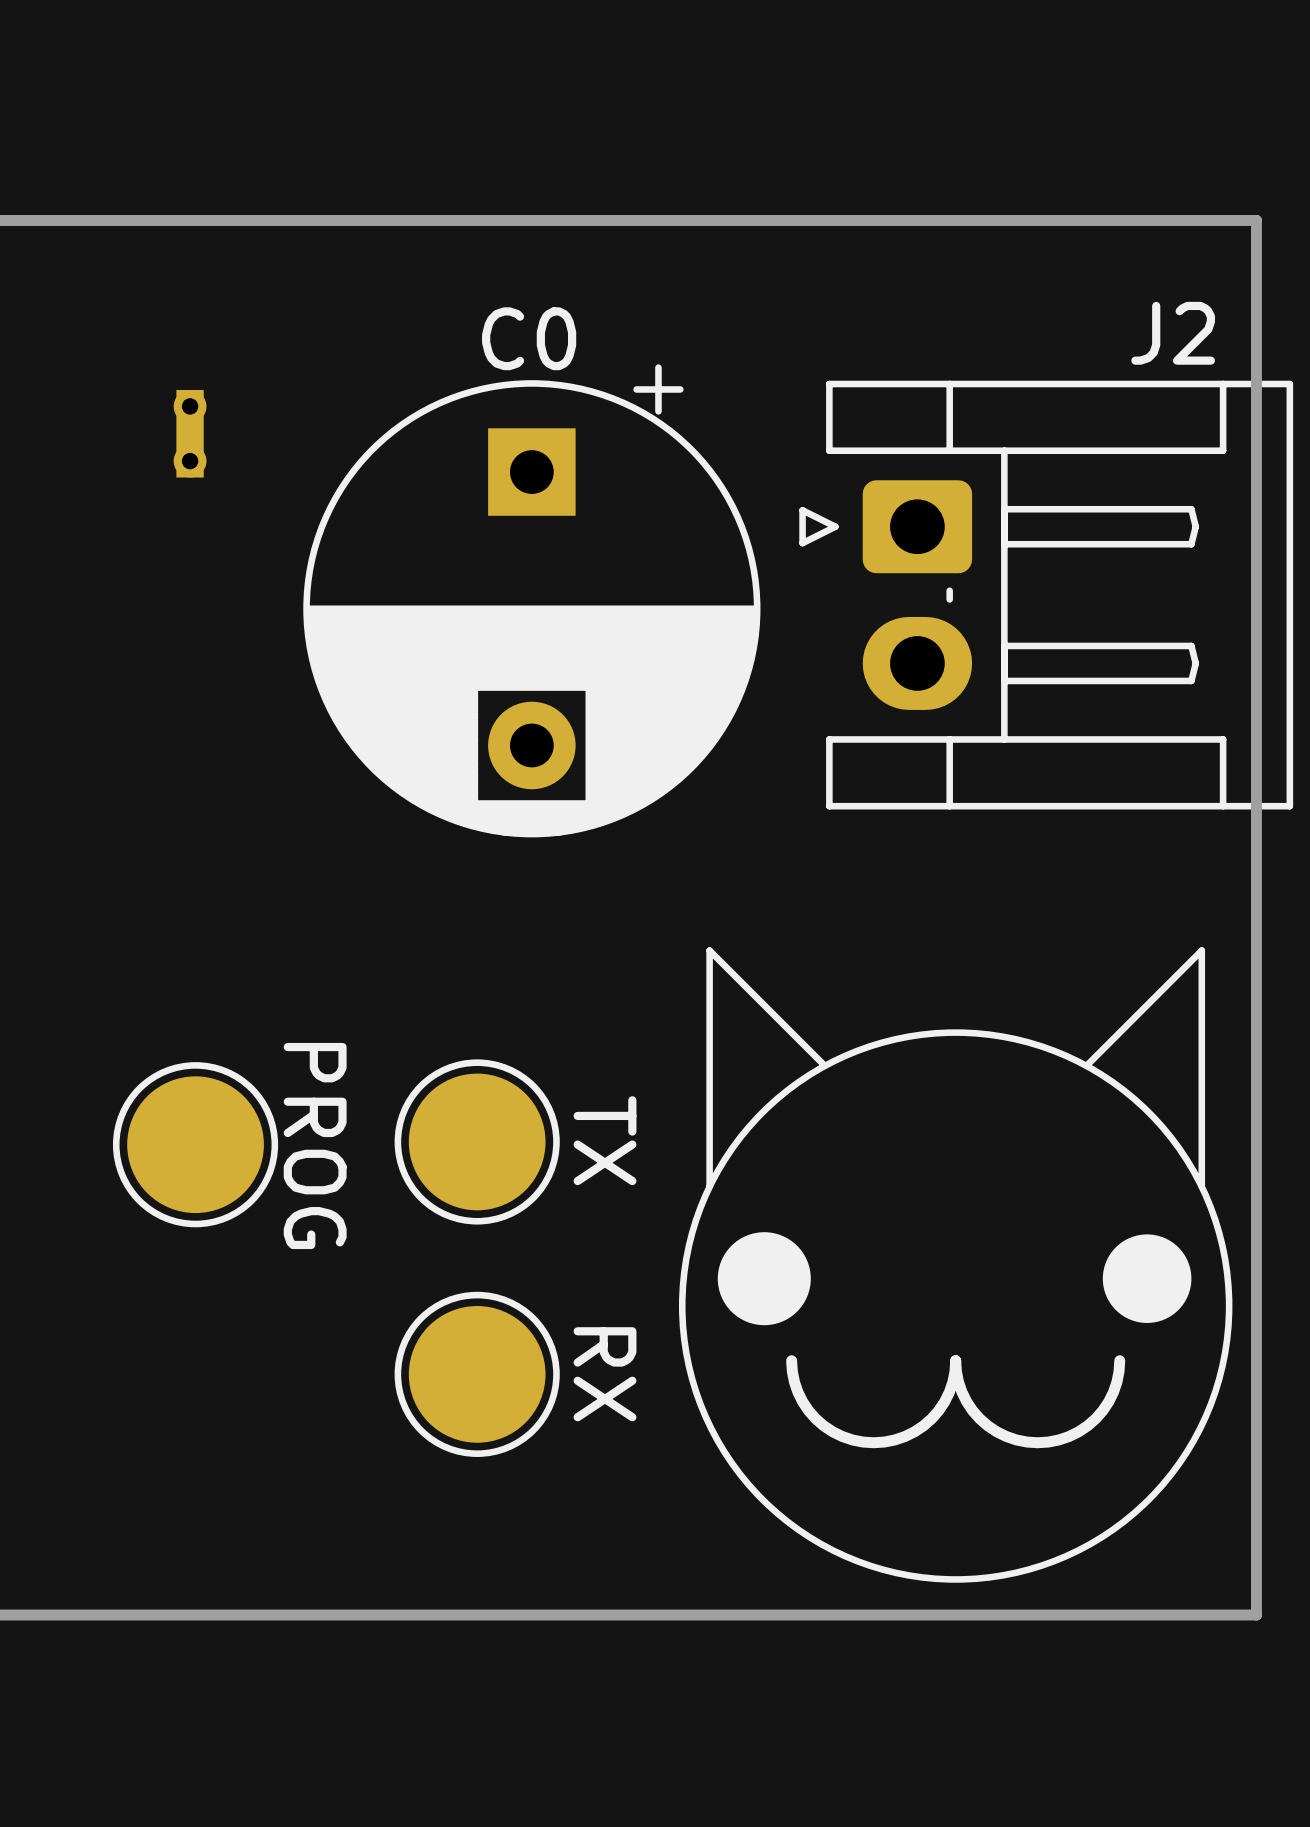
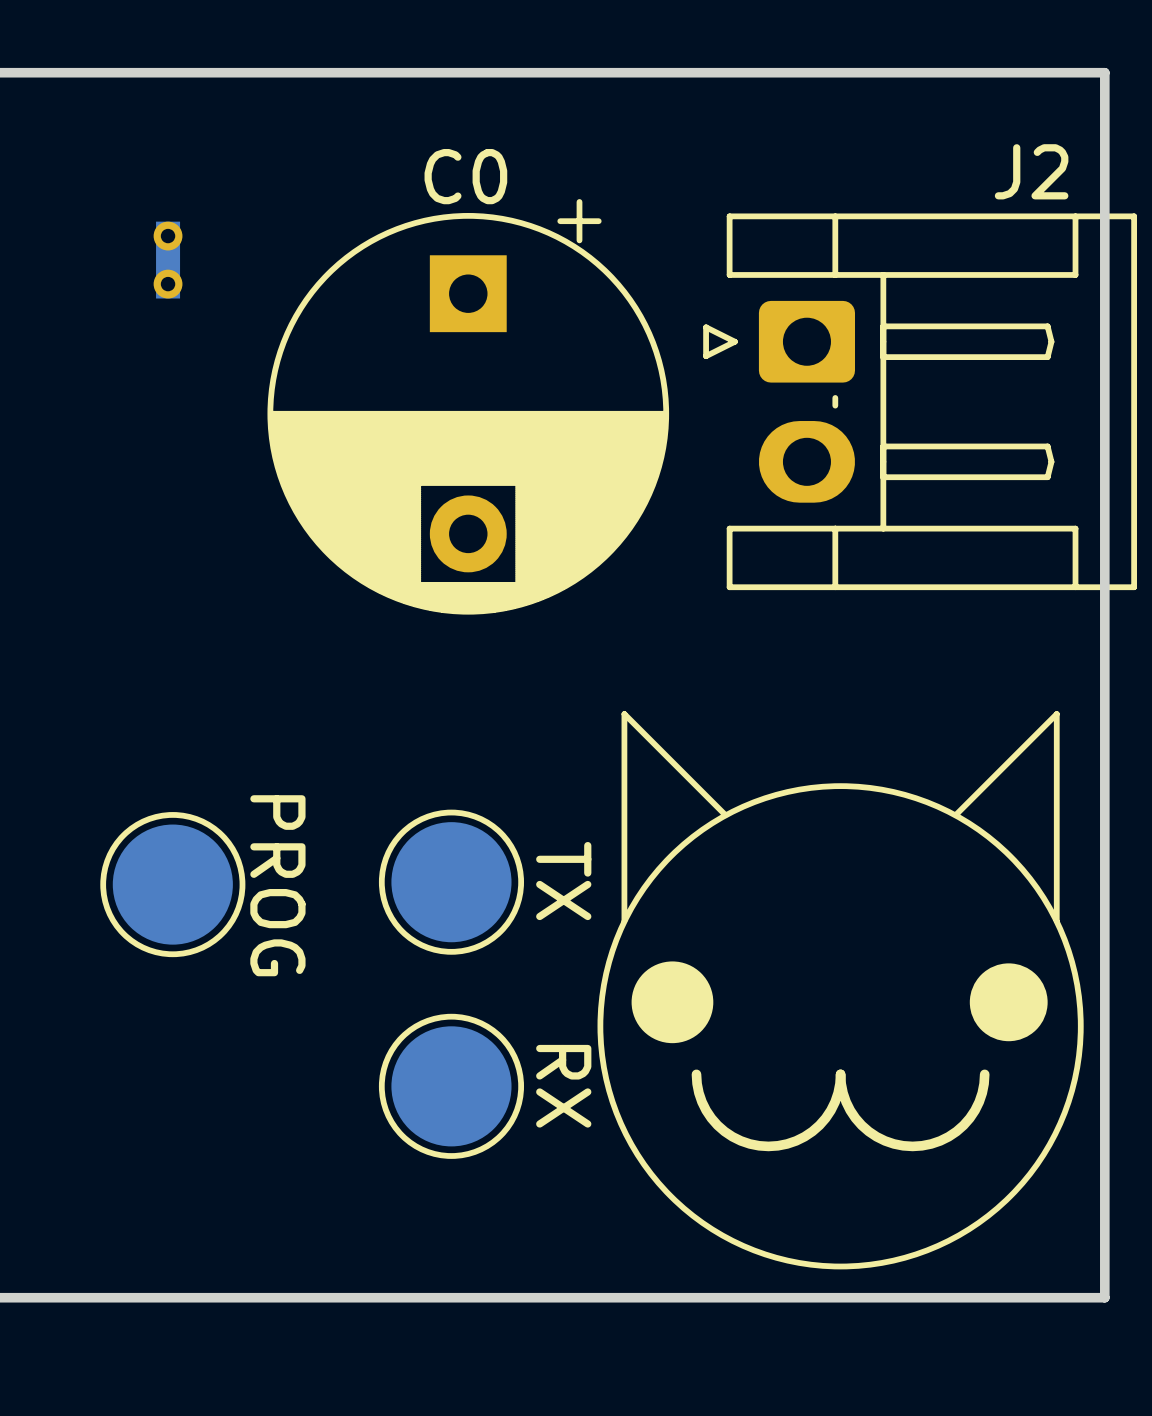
part position: (477, 1141) -> (451, 882)
part position: (477, 1374) -> (451, 1086)

